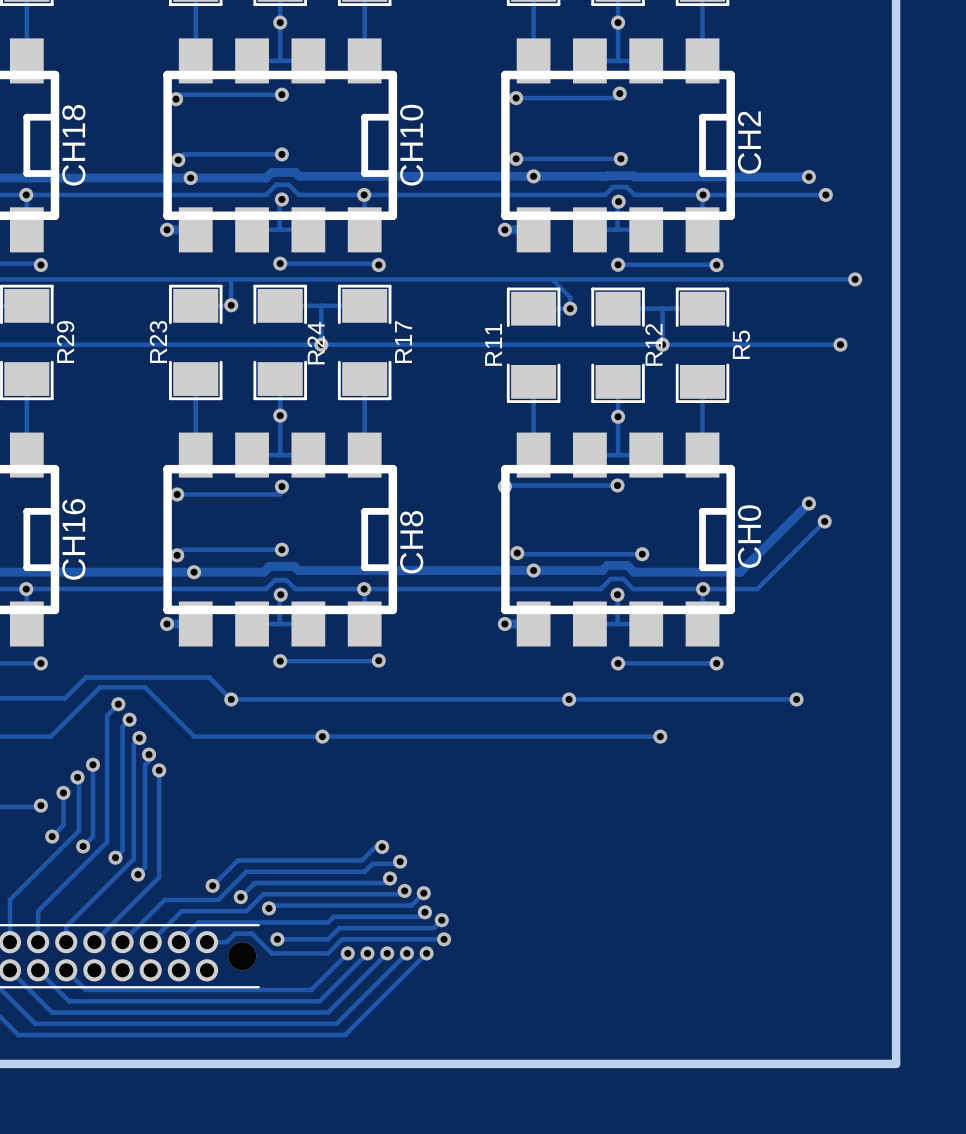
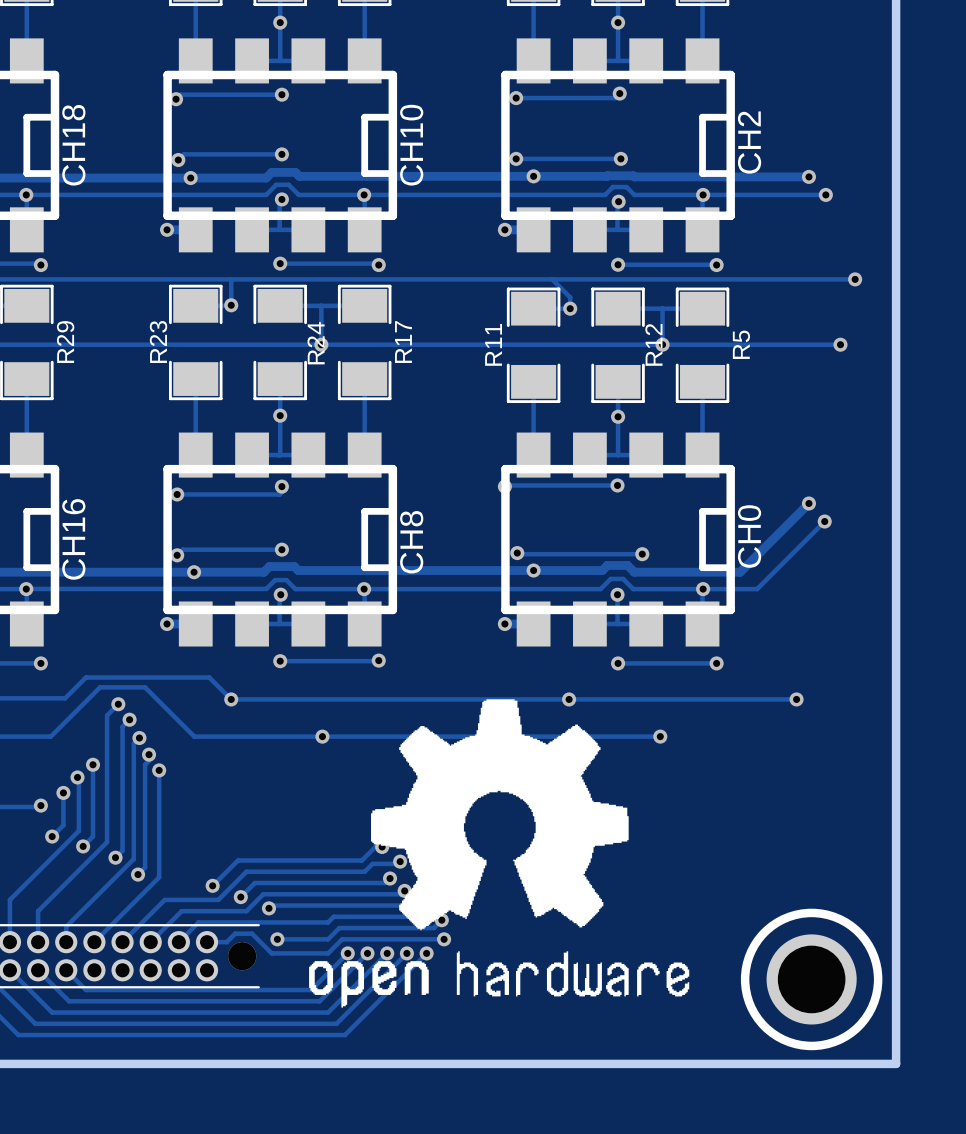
drawing: none -> [309, 699, 690, 1008]
part: none -> (811, 979)

